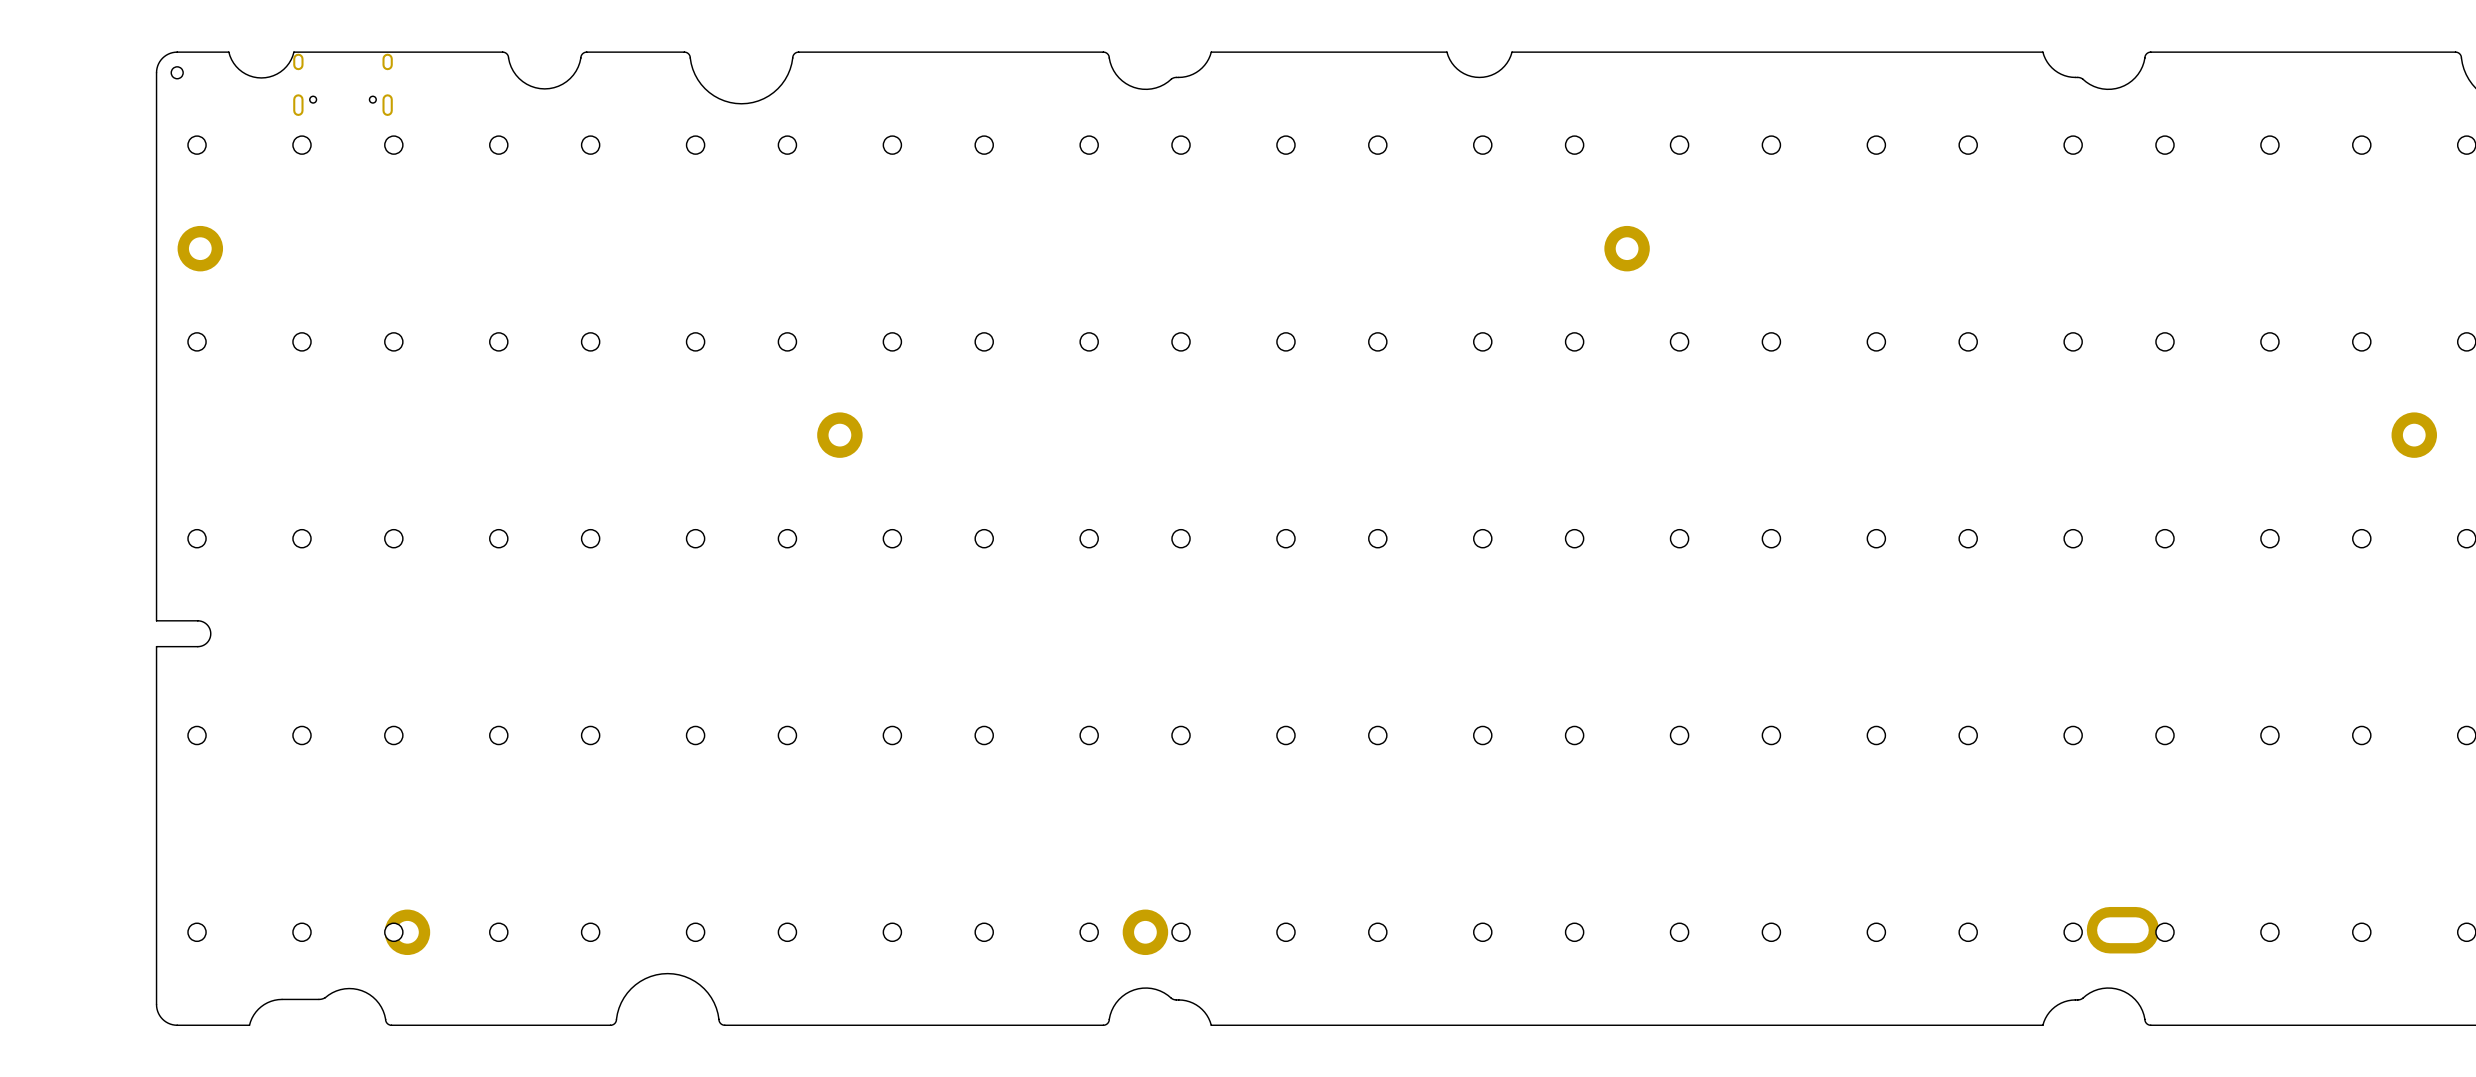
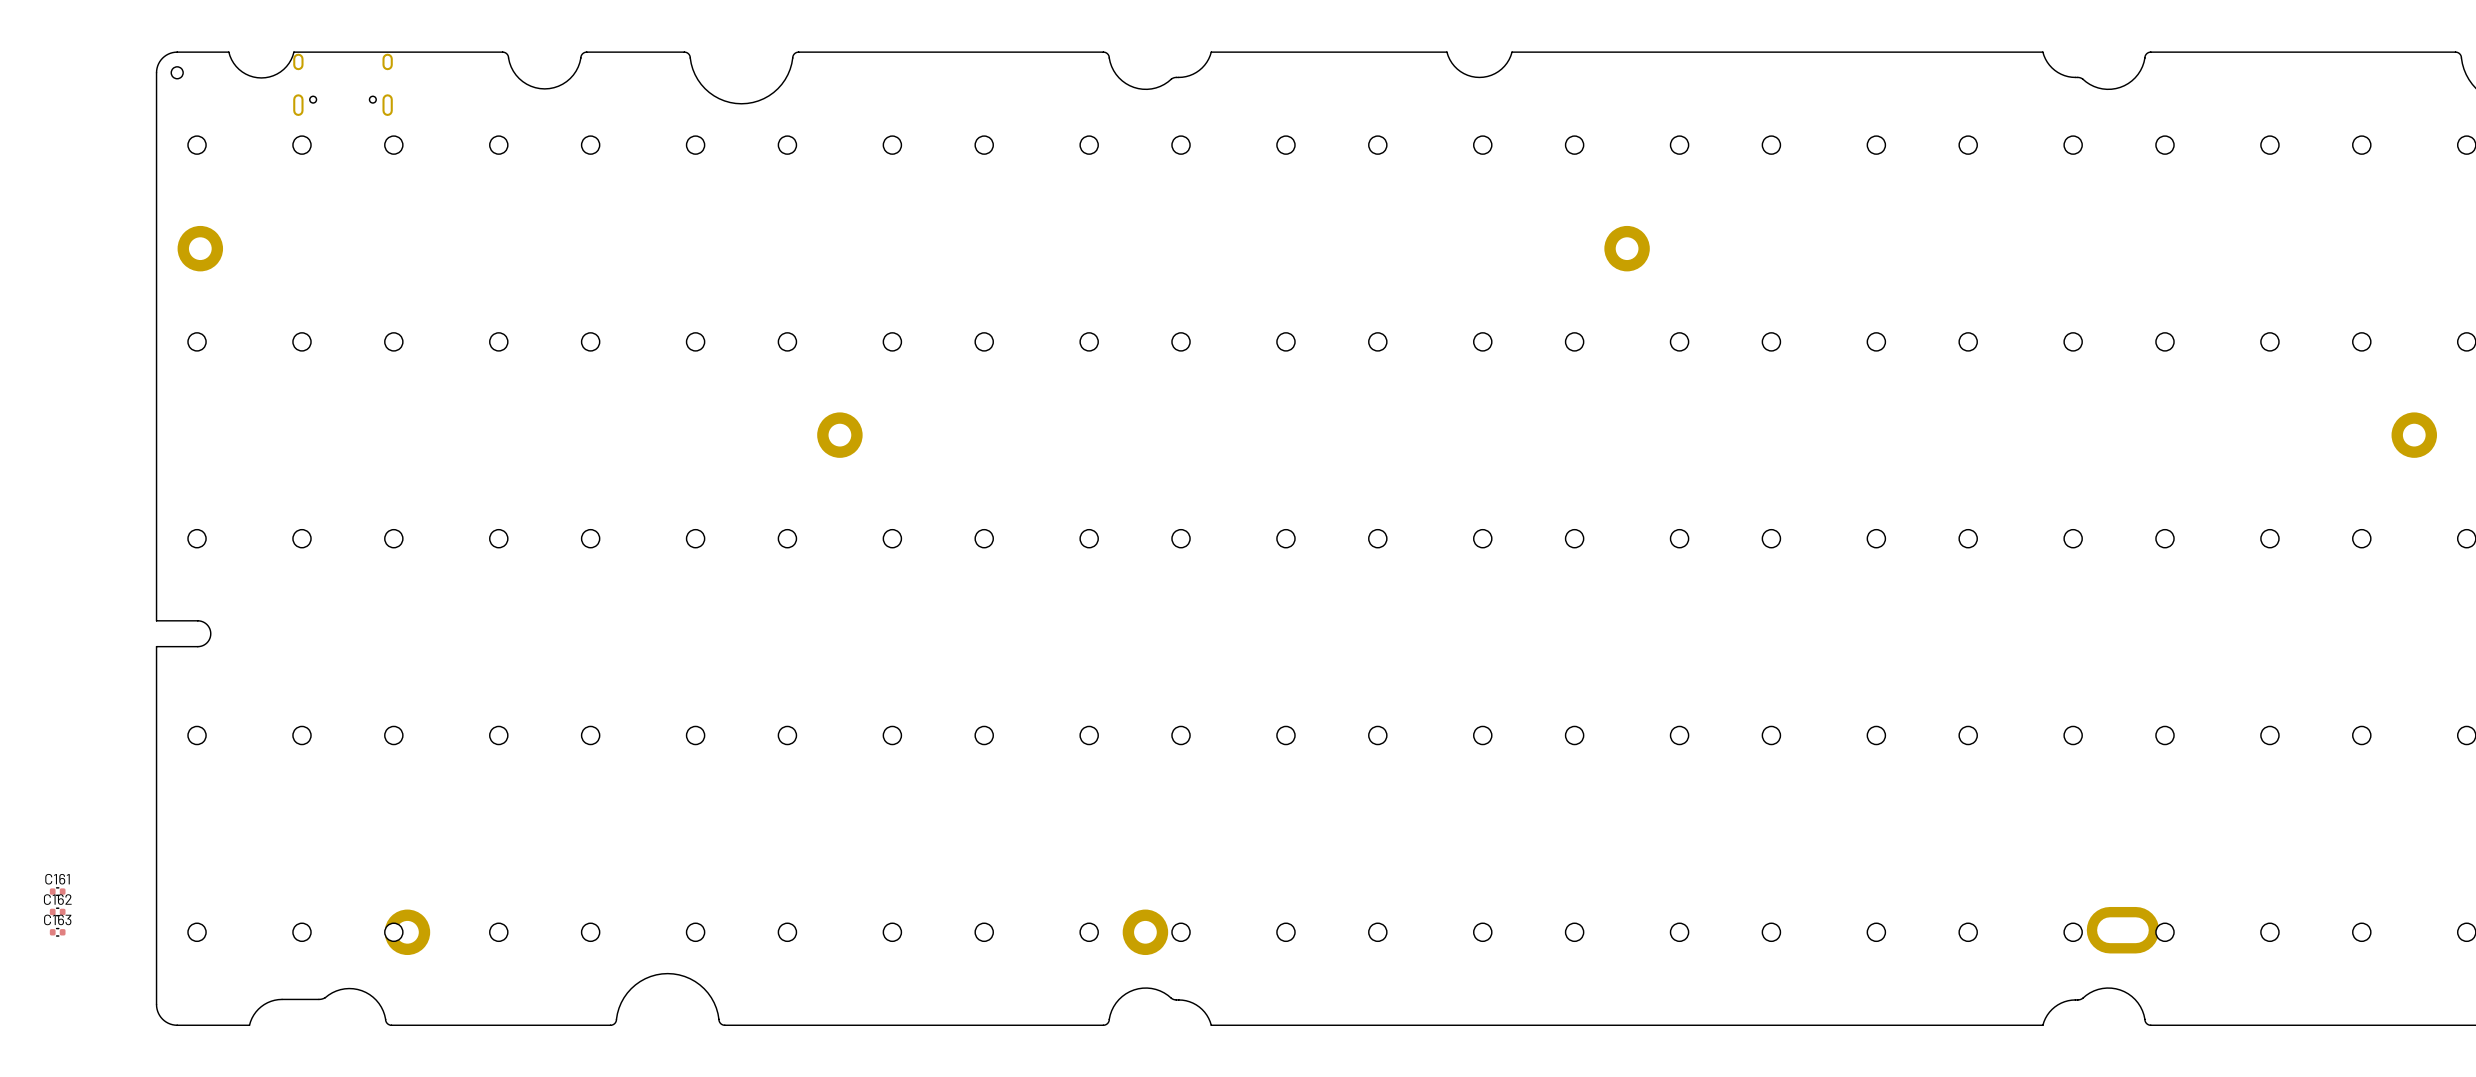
C161: none -> (57, 891)
C162: none -> (57, 911)
C163: none -> (57, 932)

